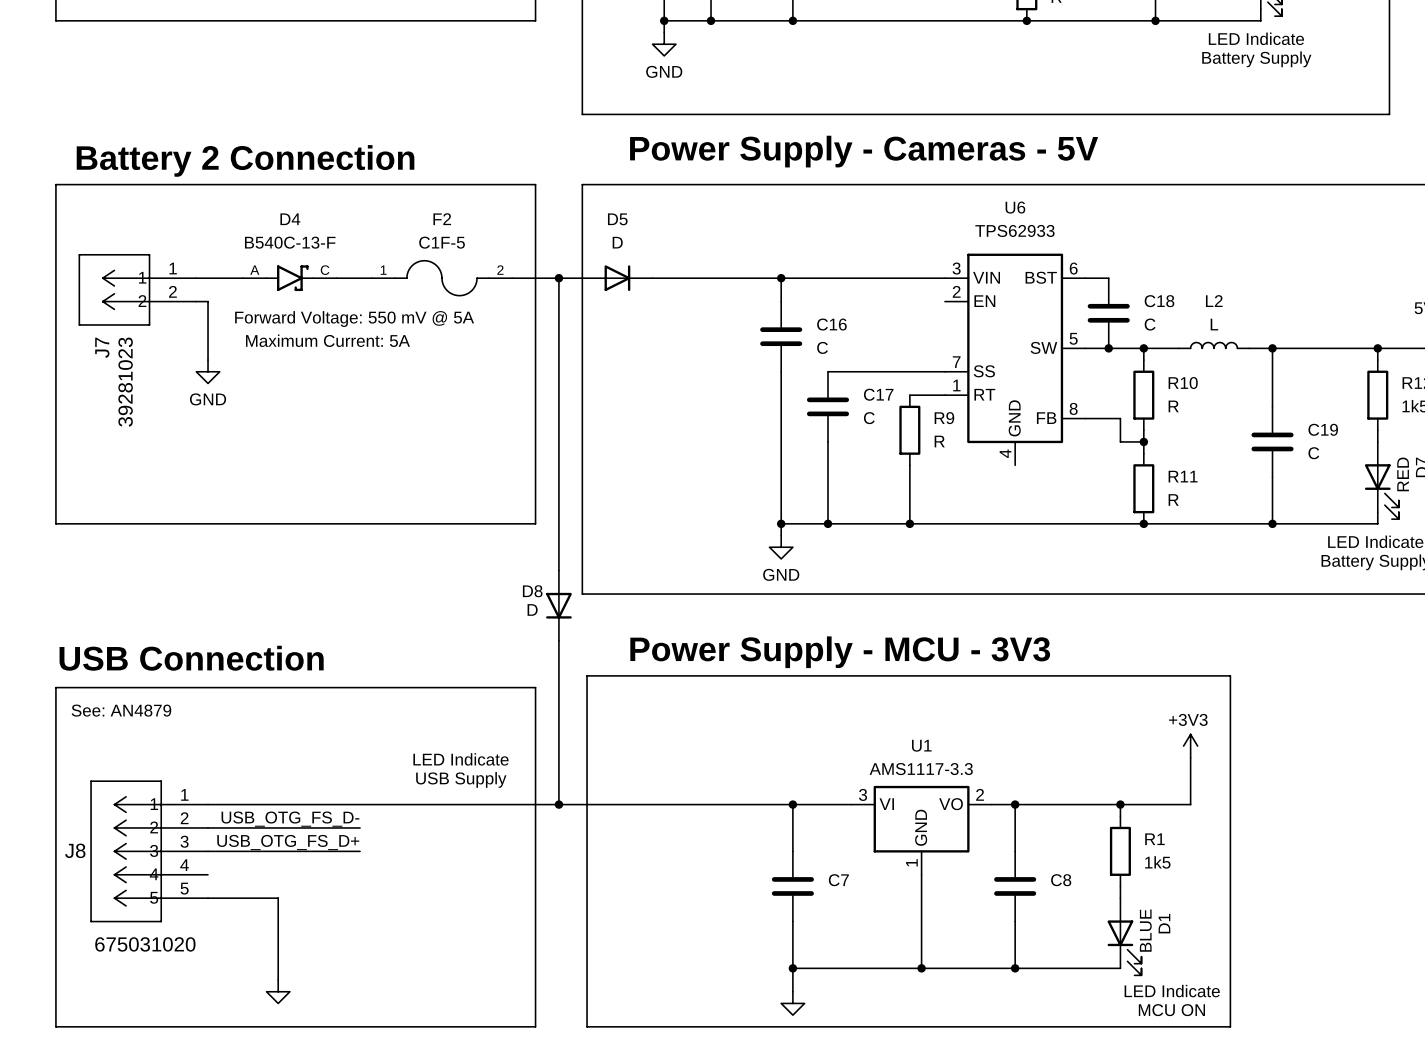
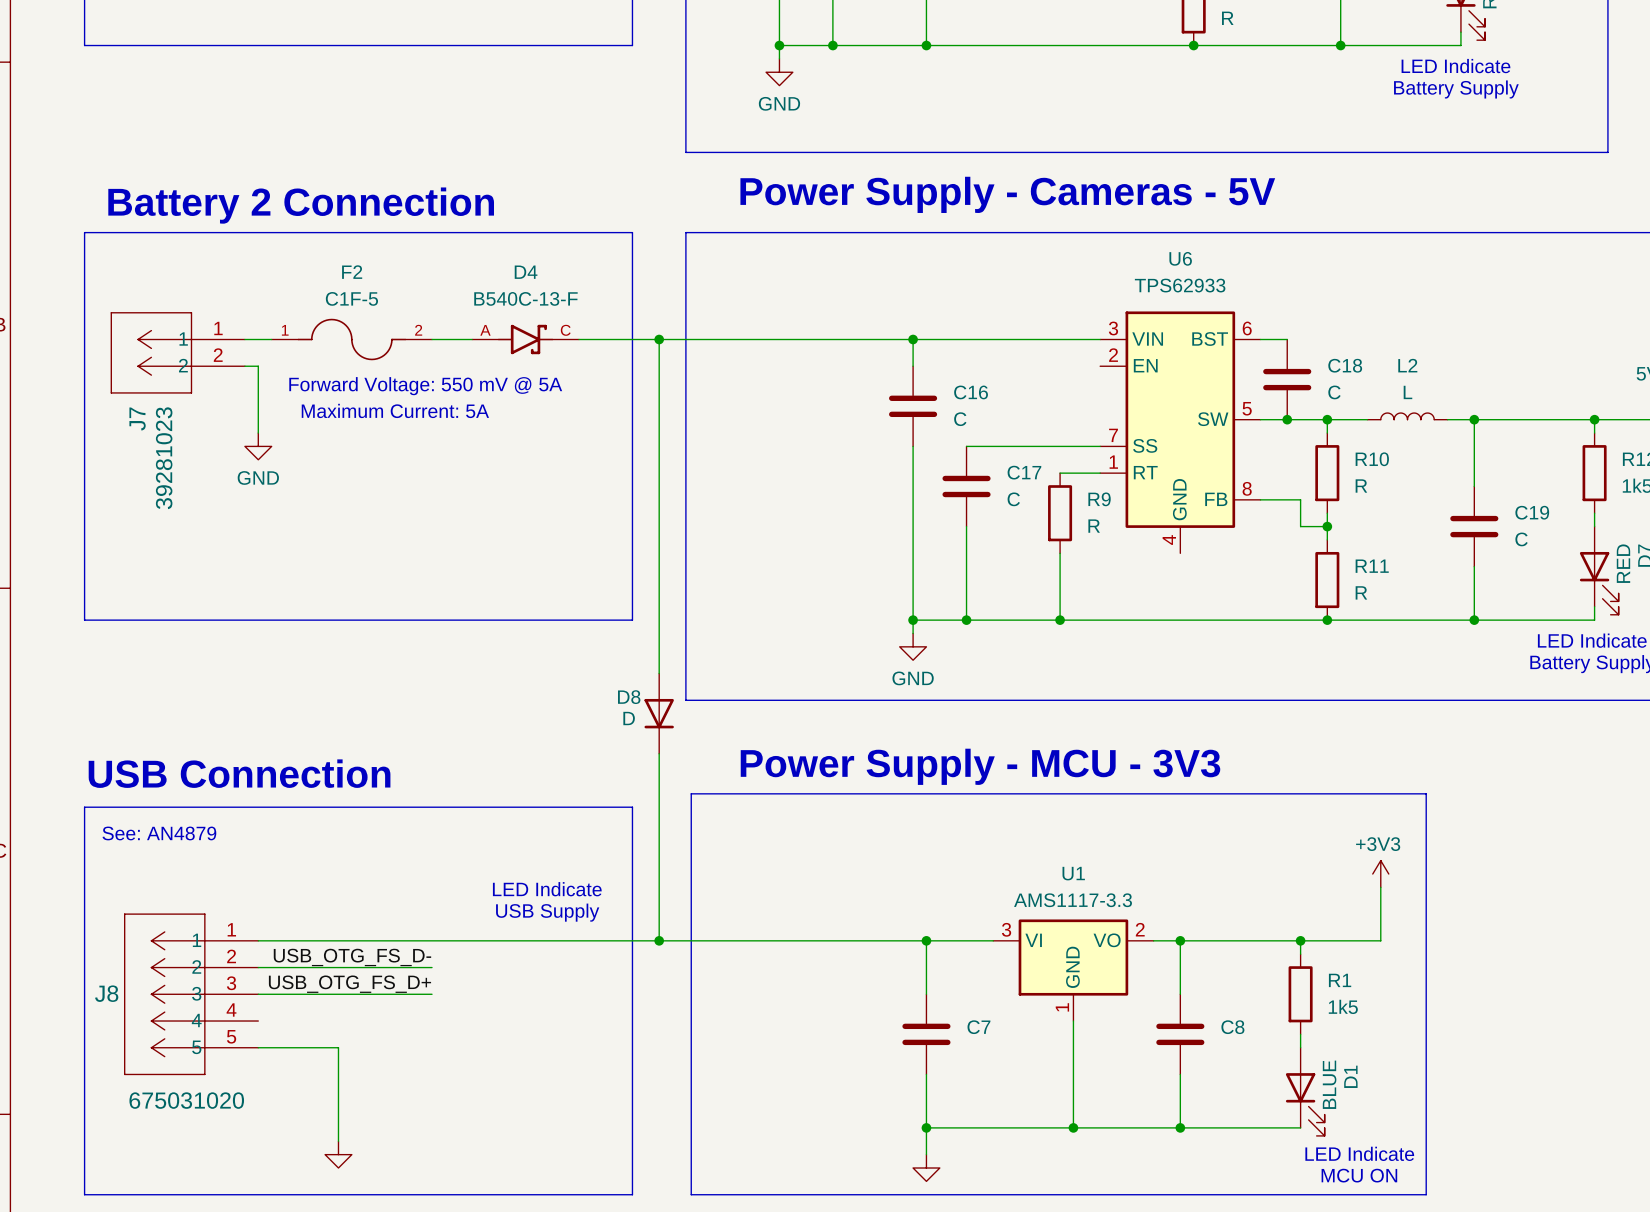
D4 position: (289, 278) -> (525, 339)
F2 position: (441, 278) -> (351, 339)
D5: D (617, 278) -> none

